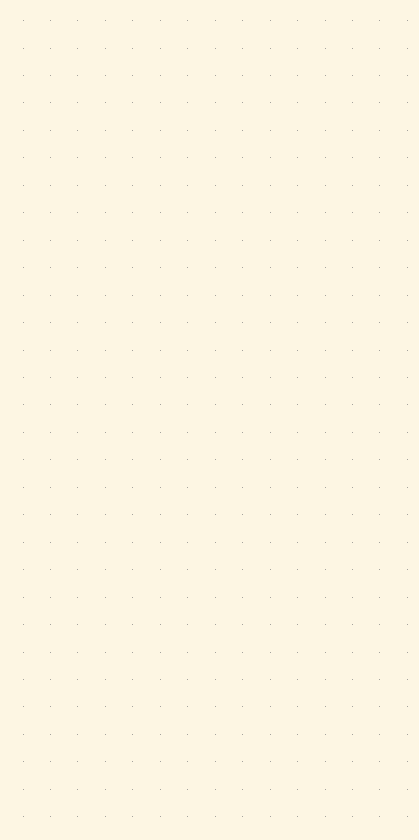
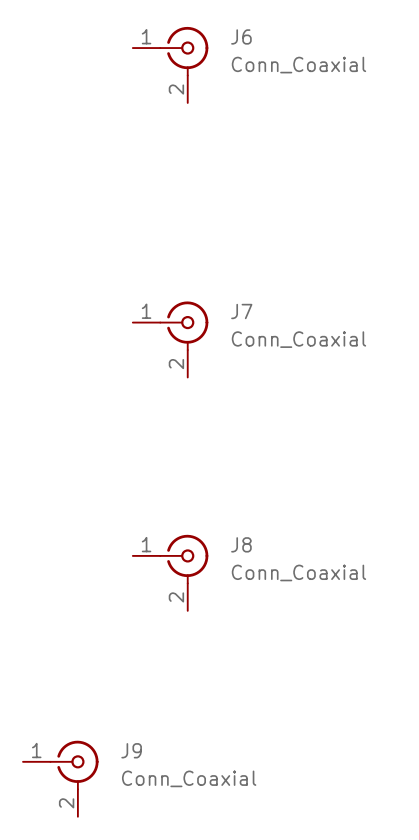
J6: none -> Conn_Coaxial (170, 64)
J7: none -> Conn_Coaxial (170, 339)
J8: none -> Conn_Coaxial (170, 572)
J9: none -> Conn_Coaxial (60, 778)

